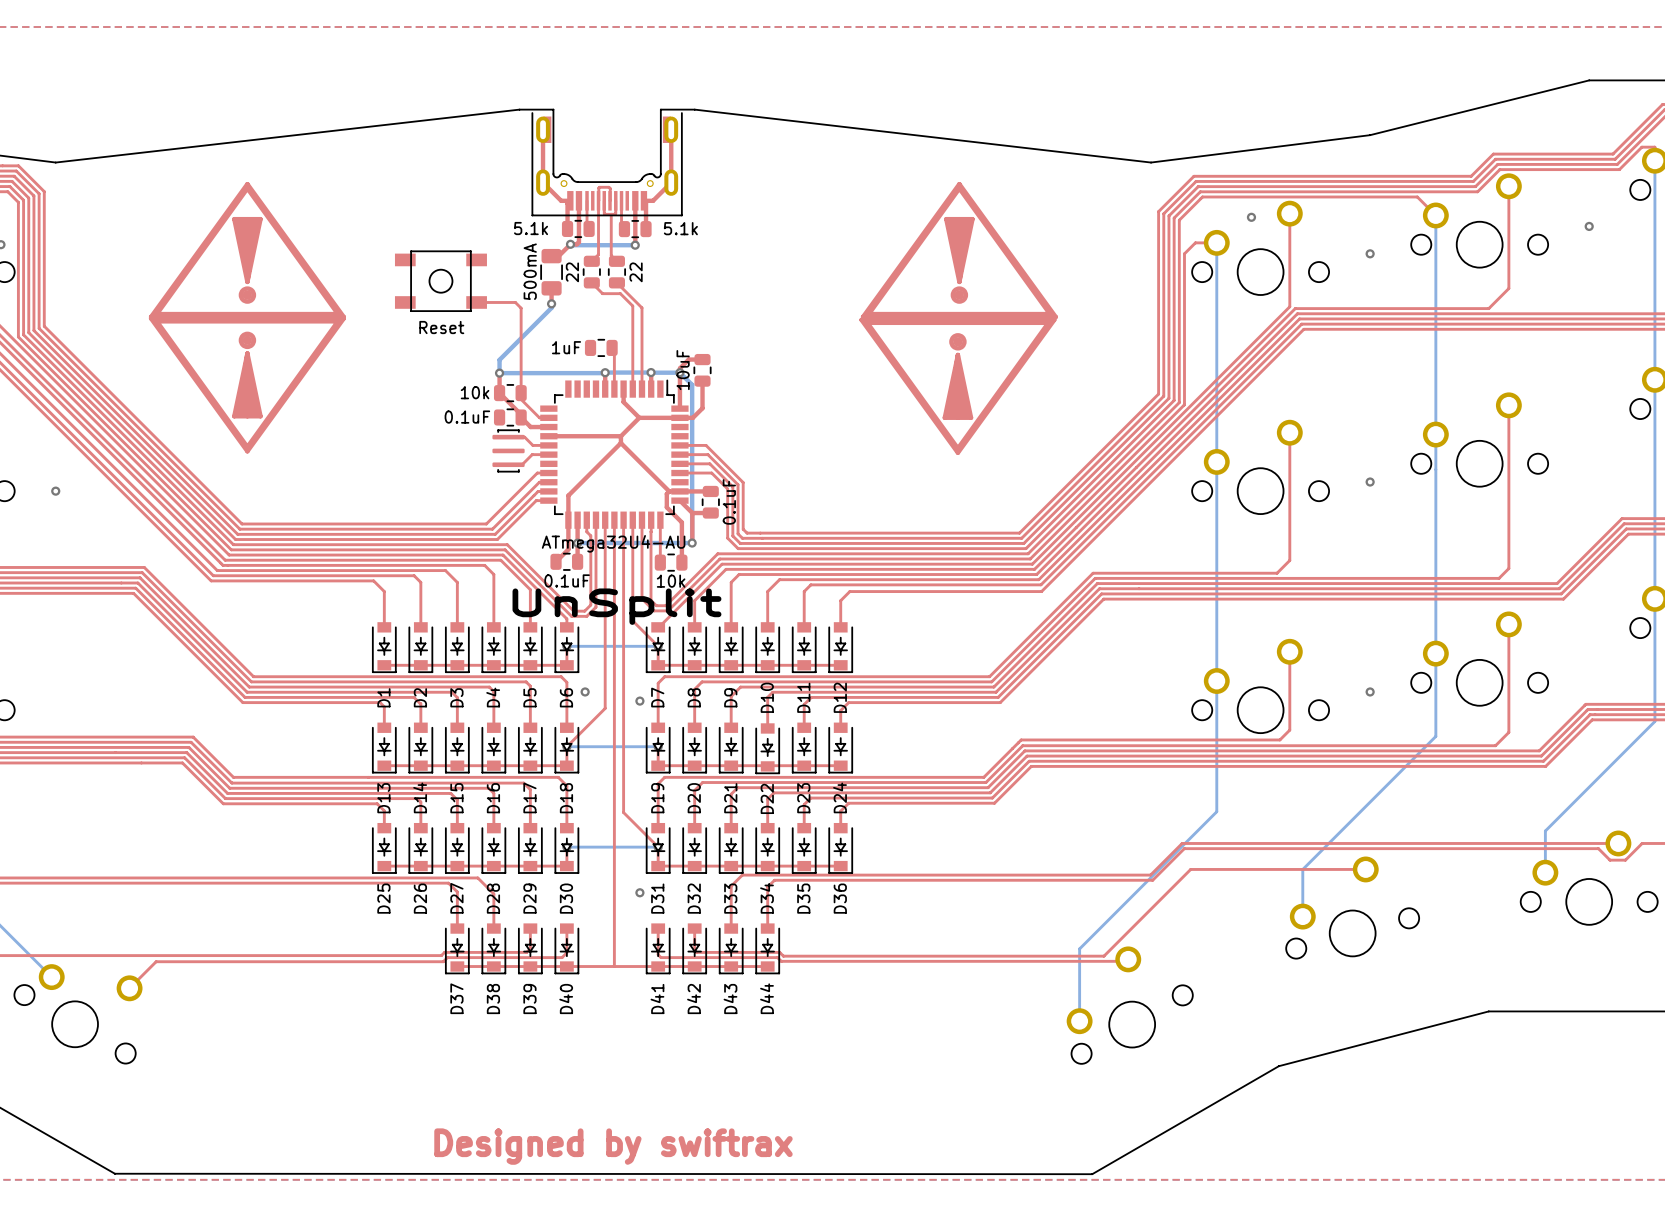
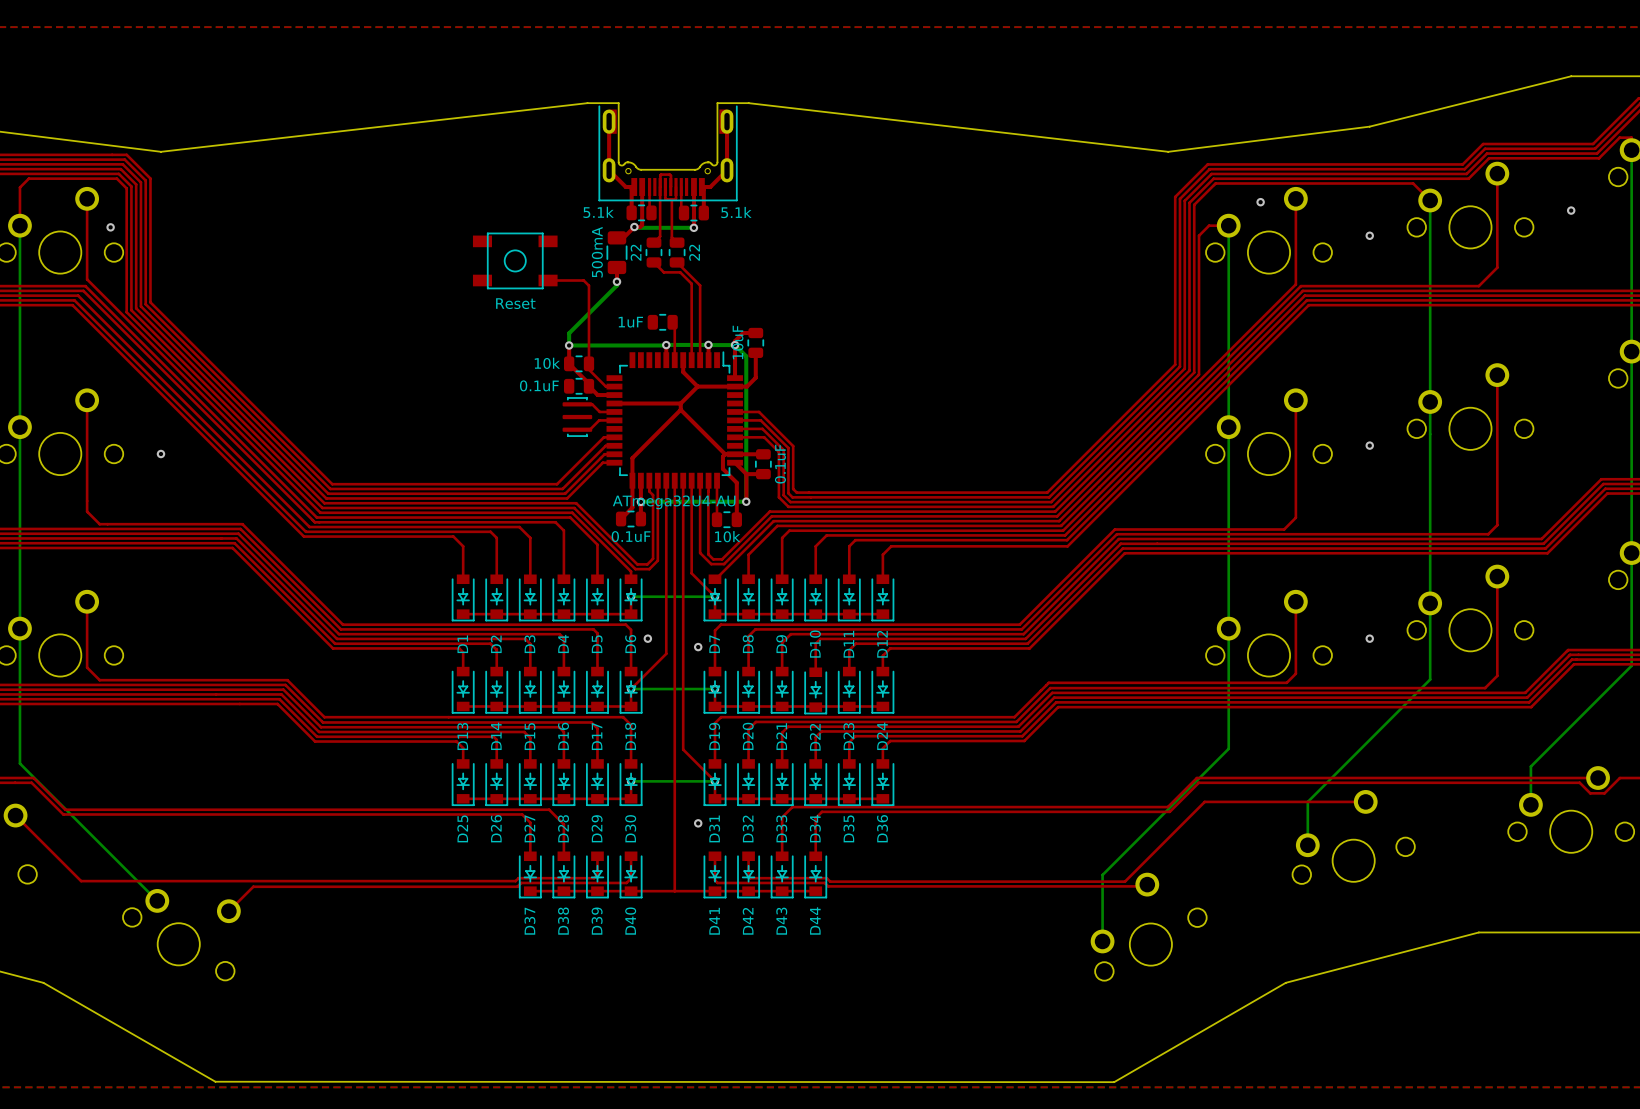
drawing: [148, 181, 346, 454] -> none
drawing: [859, 181, 1058, 456] -> none
text: UnSplit (616, 606) -> none
text: Designed by swiftrax (613, 1146) -> none

